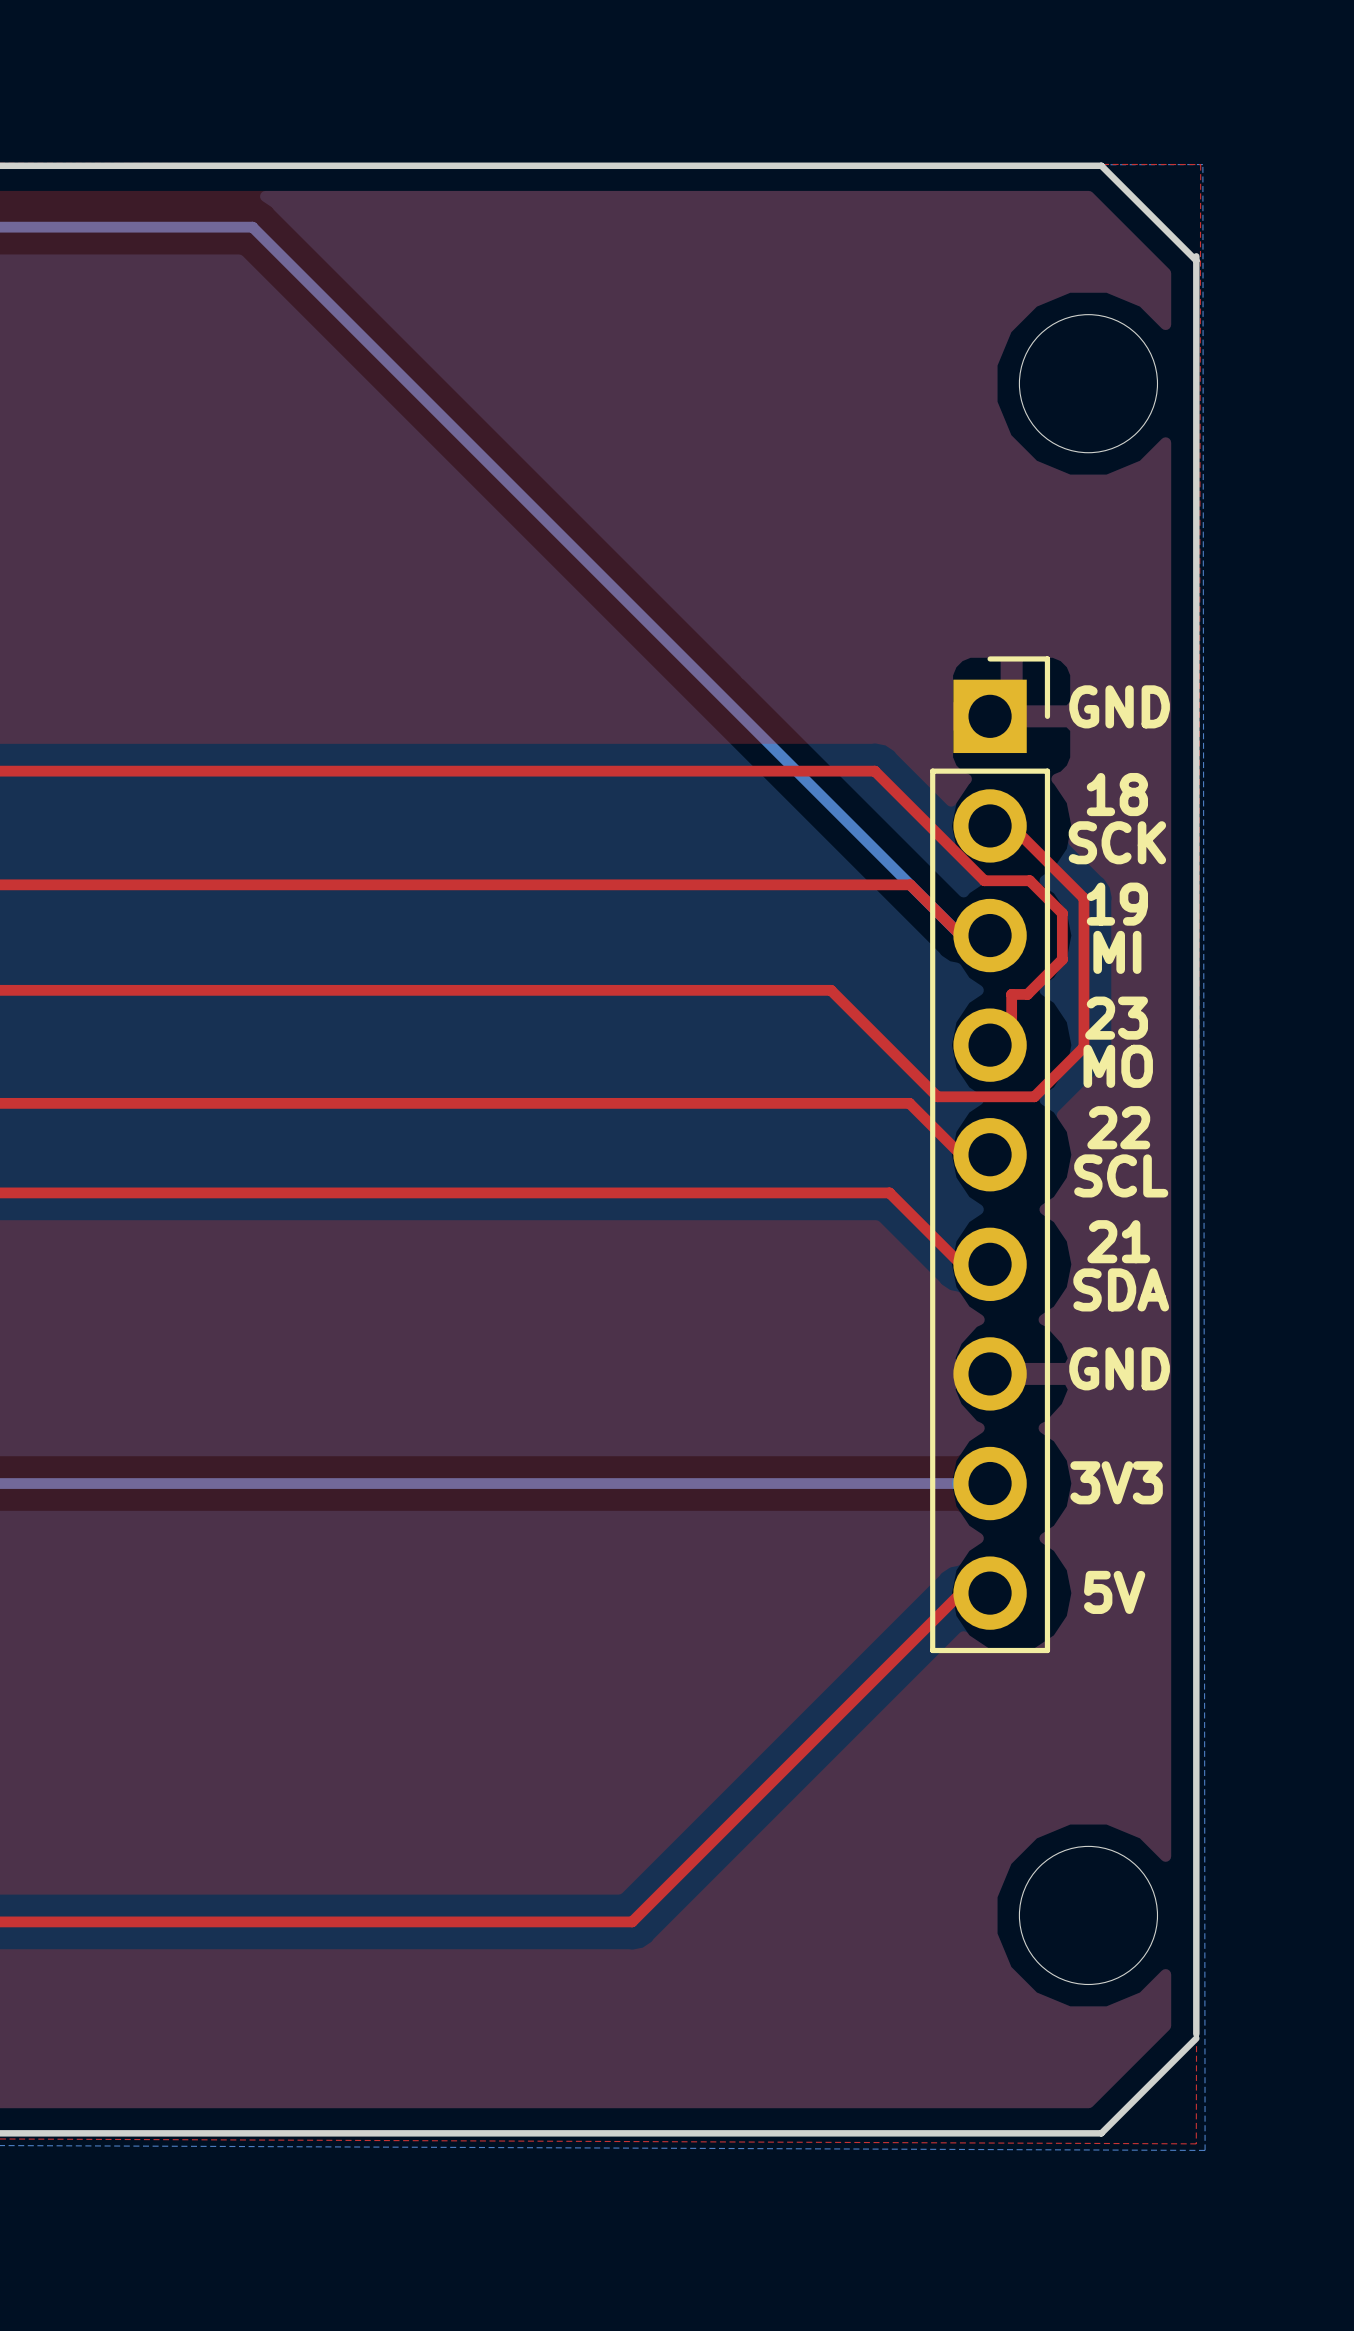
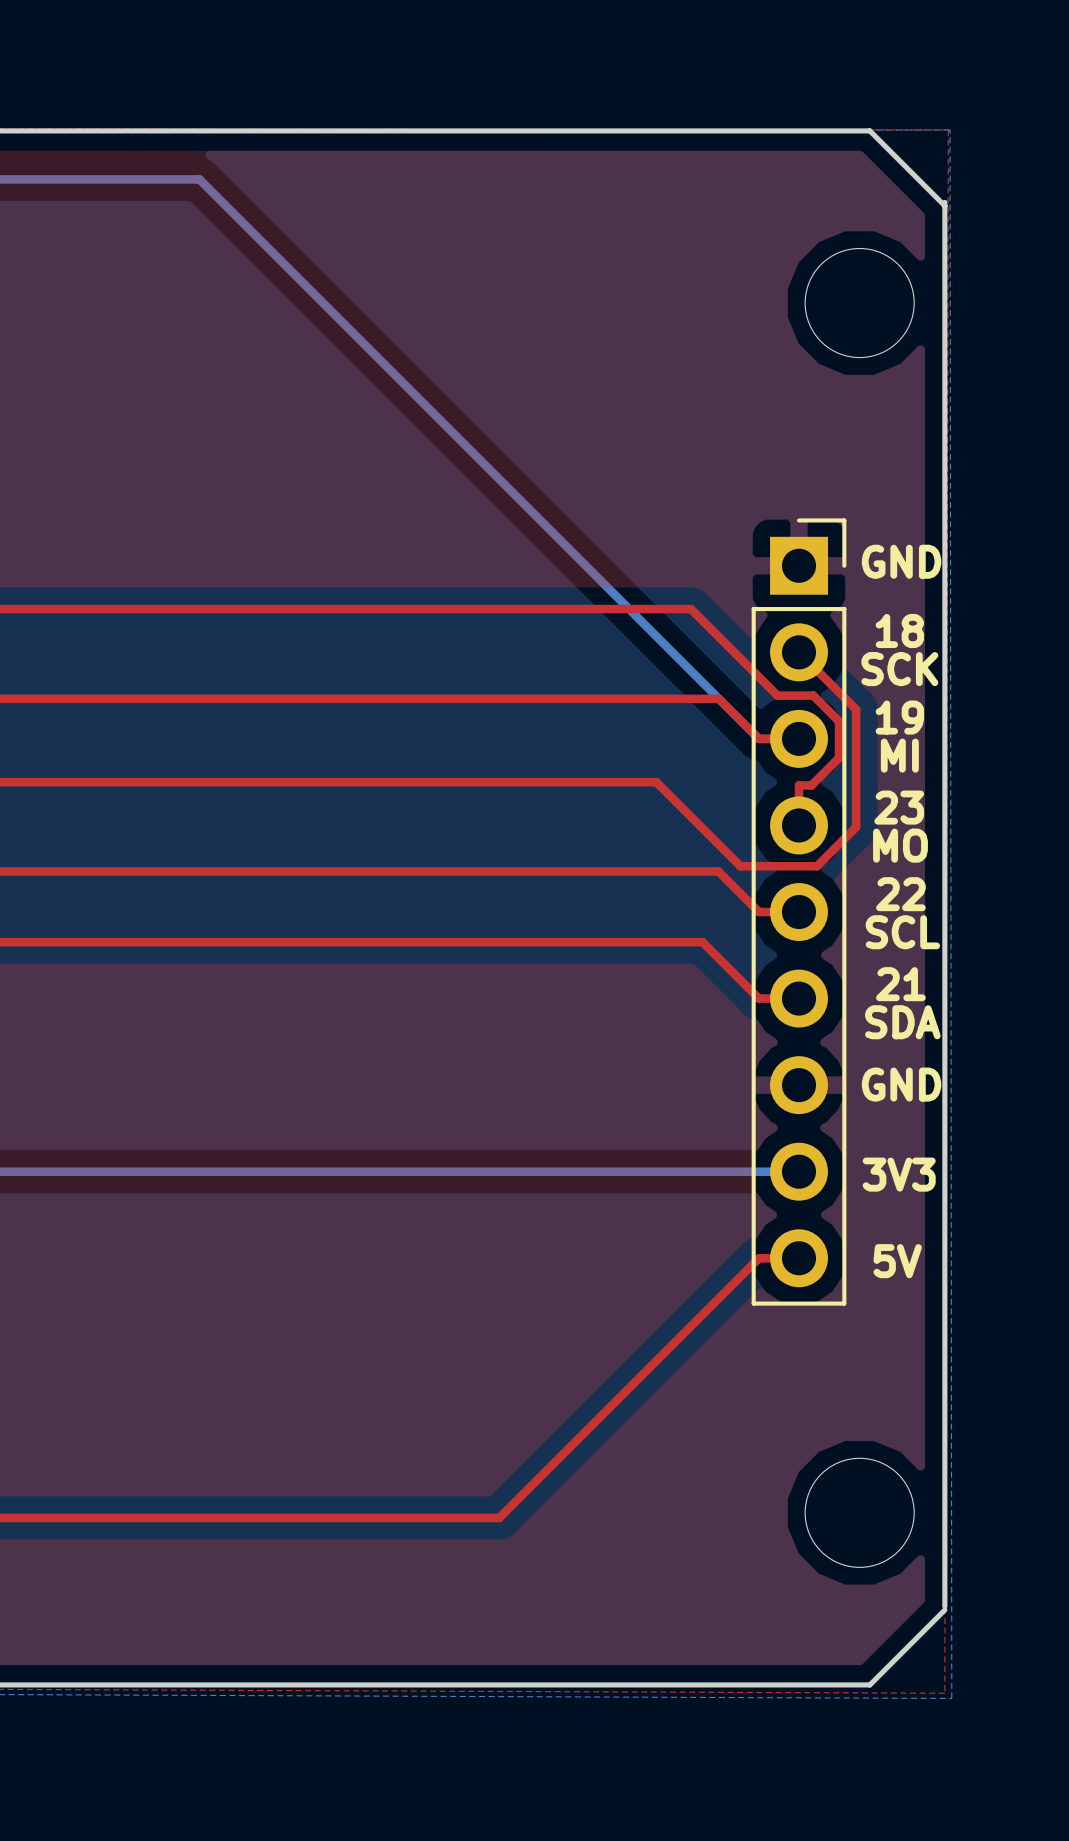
text position: GND (1119, 706) -> GND (901, 561)
text position: 18 (1117, 794) -> 18 (899, 630)
text position: SCK (1117, 842) -> SCK (899, 669)
text position: 19 (1117, 904) -> 19 (899, 717)
text position: MI (1117, 952) -> MI (899, 755)
text position: 23 (1116, 1018) -> 23 (899, 807)
text position: MO (1118, 1066) -> MO (900, 845)
text position: 22 (1118, 1127) -> 22 (900, 894)
part position: (990, 1154) -> (799, 912)
text position: SCL (1121, 1175) -> SCL (902, 932)
text position: 21 (1118, 1241) -> 21 (900, 984)
text position: SDA (1121, 1289) -> SDA (902, 1022)
text position: GND (1119, 1368) -> GND (901, 1084)
text position: 3V3 (1116, 1482) -> 3V3 (899, 1174)
text position: 5V (1114, 1592) -> 5V (897, 1261)

